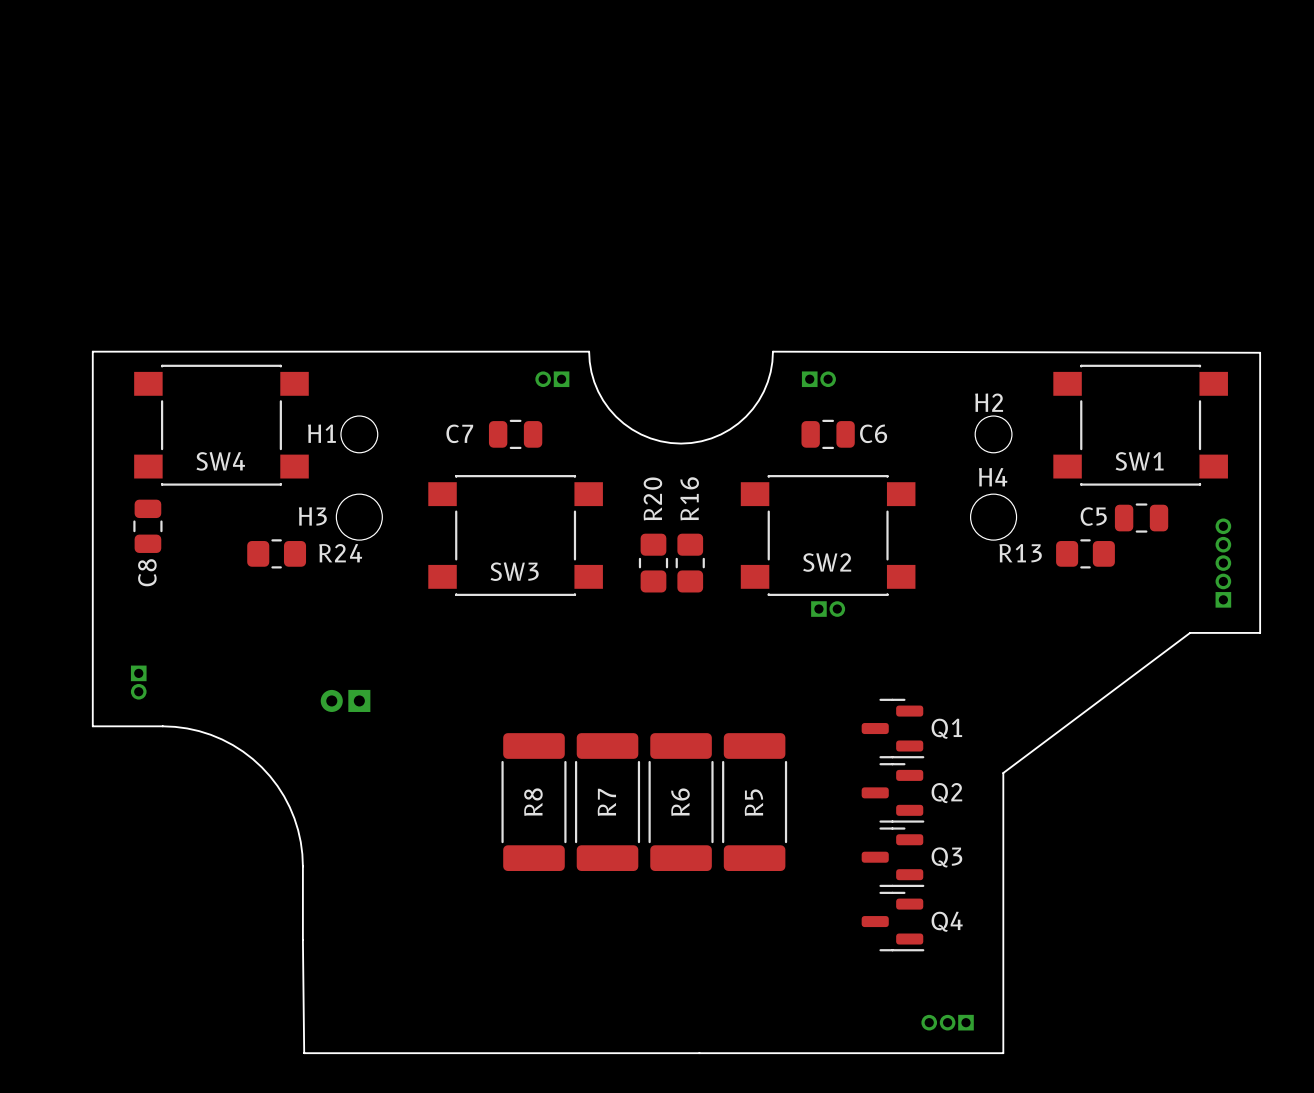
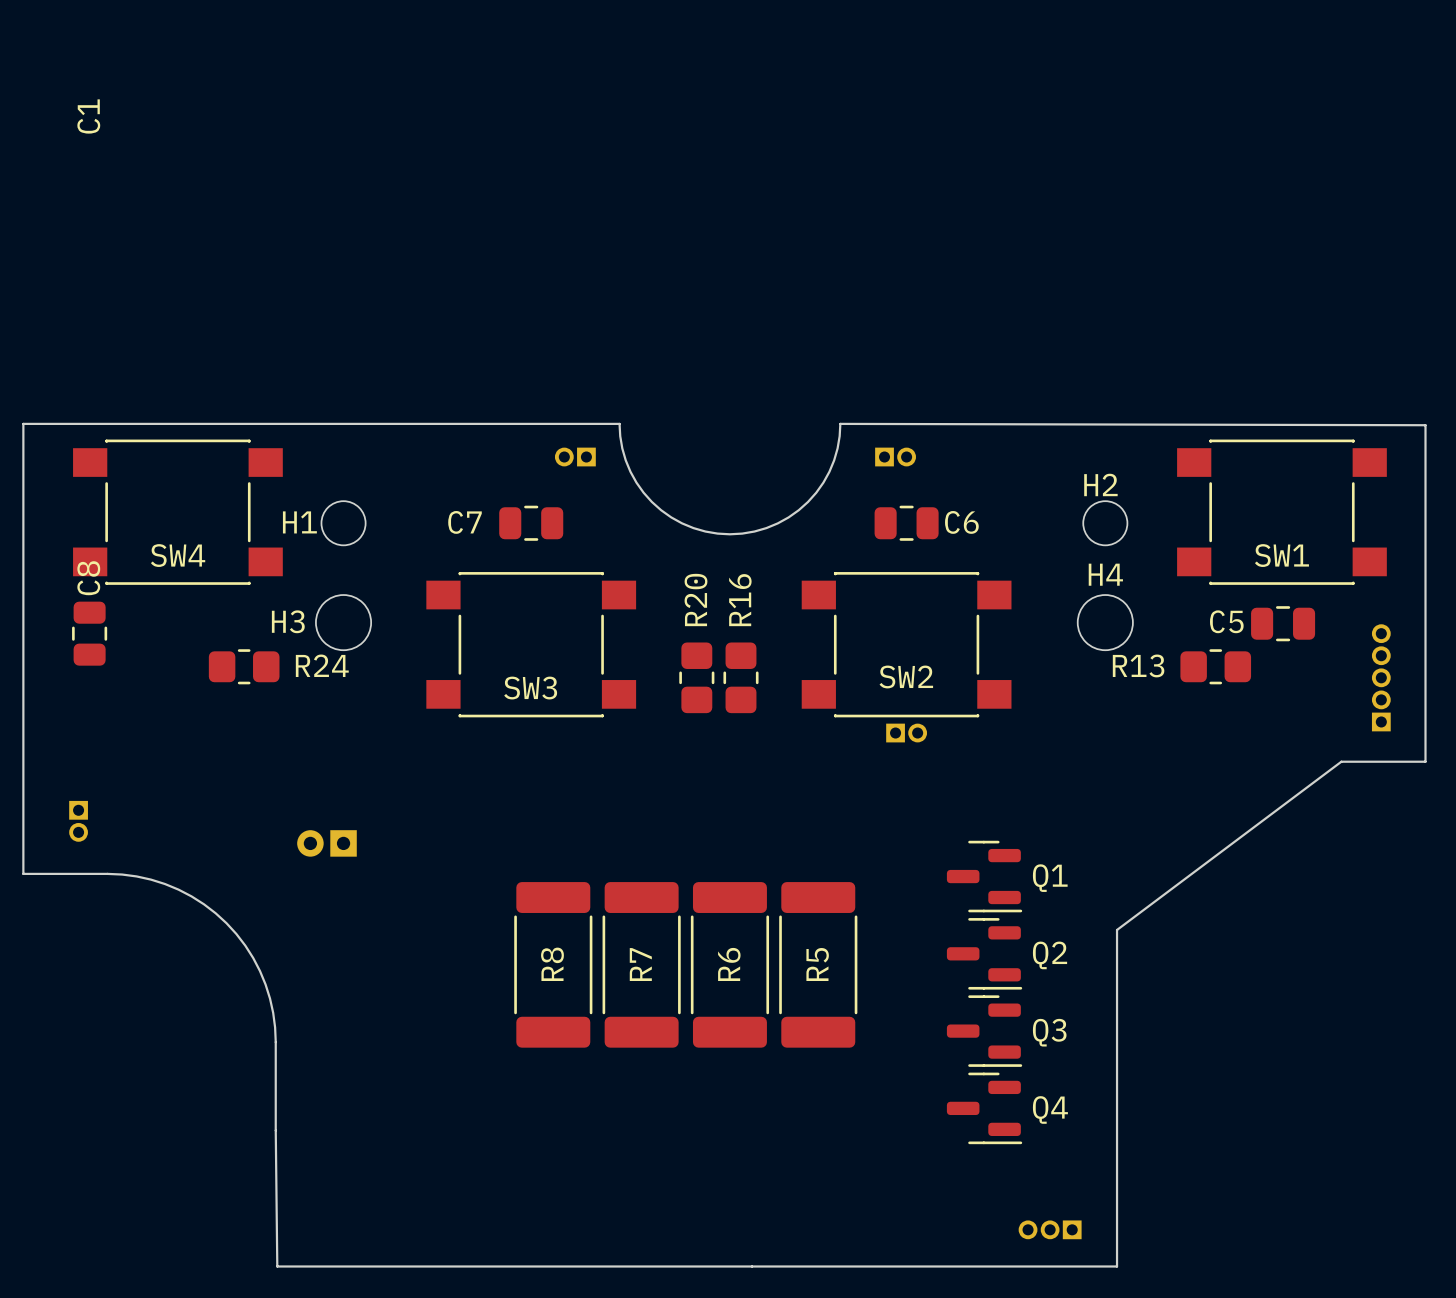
C1: none -> (88, 116)
C8 name position: C8 (147, 572) -> C8 (88, 578)

